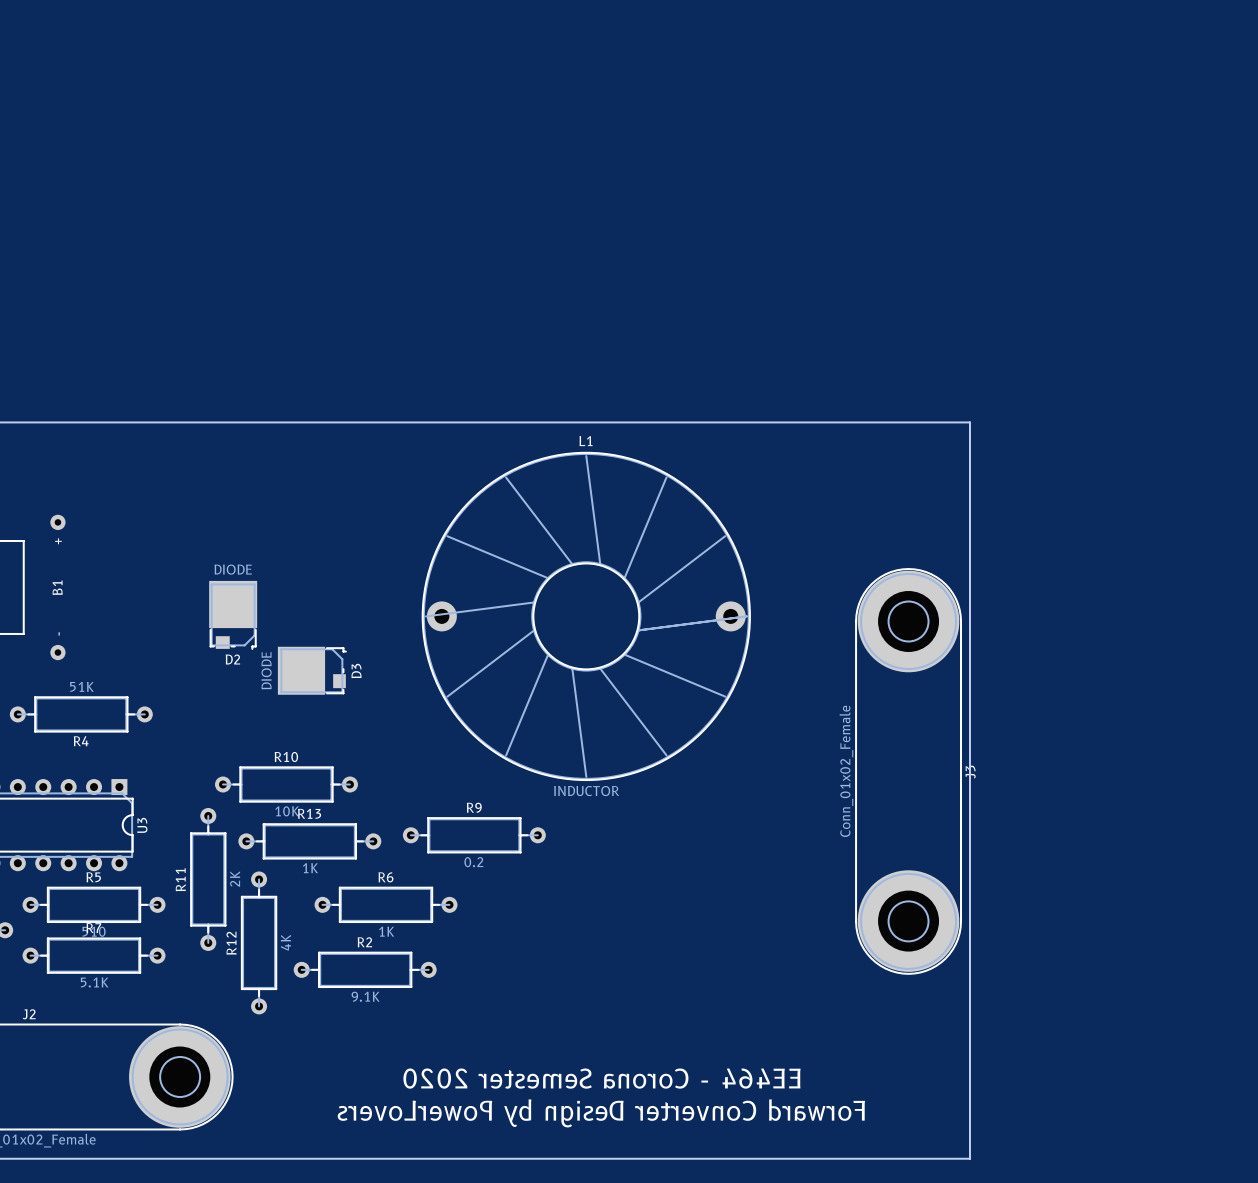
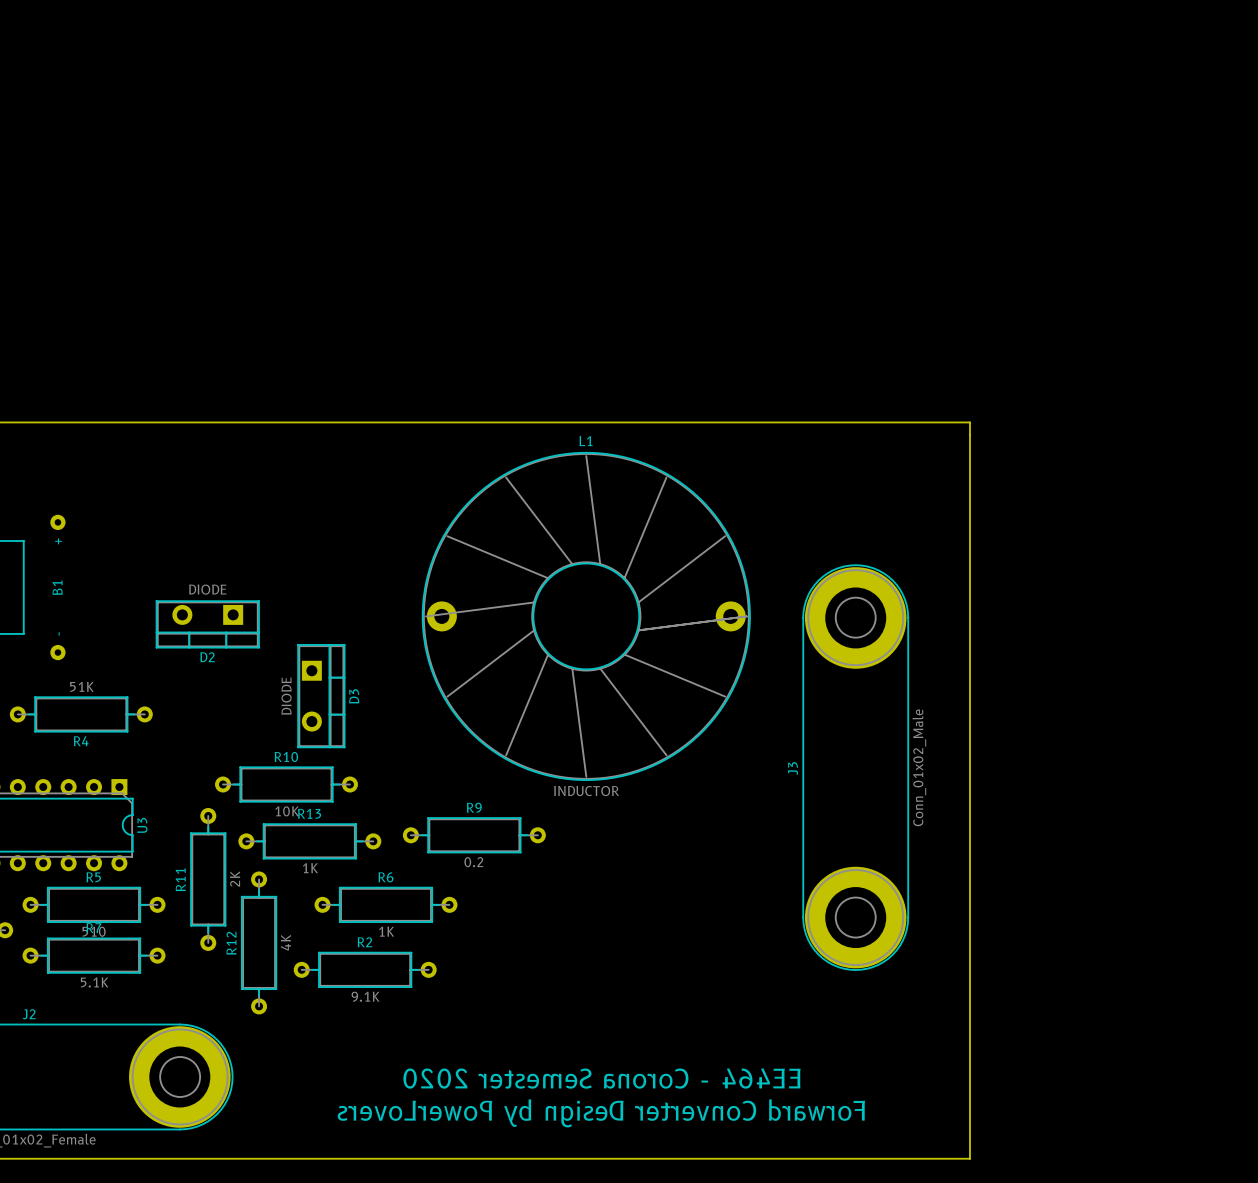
D2 footprint: [209, 580, 258, 650] -> [155, 600, 260, 649]
D3 footprint: [277, 646, 347, 695] -> [297, 644, 346, 748]
J3 value: Conn_01x02_Female (846, 771) -> Conn_01x02_Male (919, 767)
J3 rotation: 0° (908, 771) -> 180° (855, 767)

